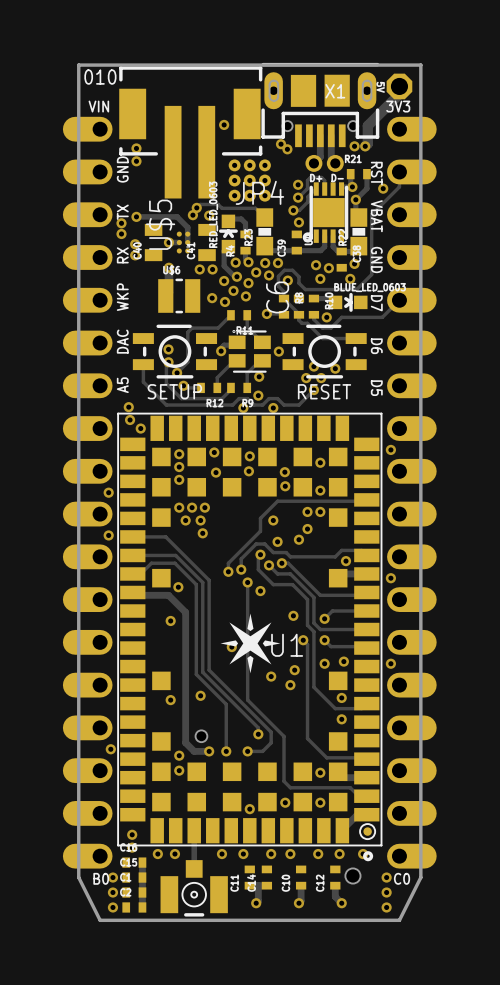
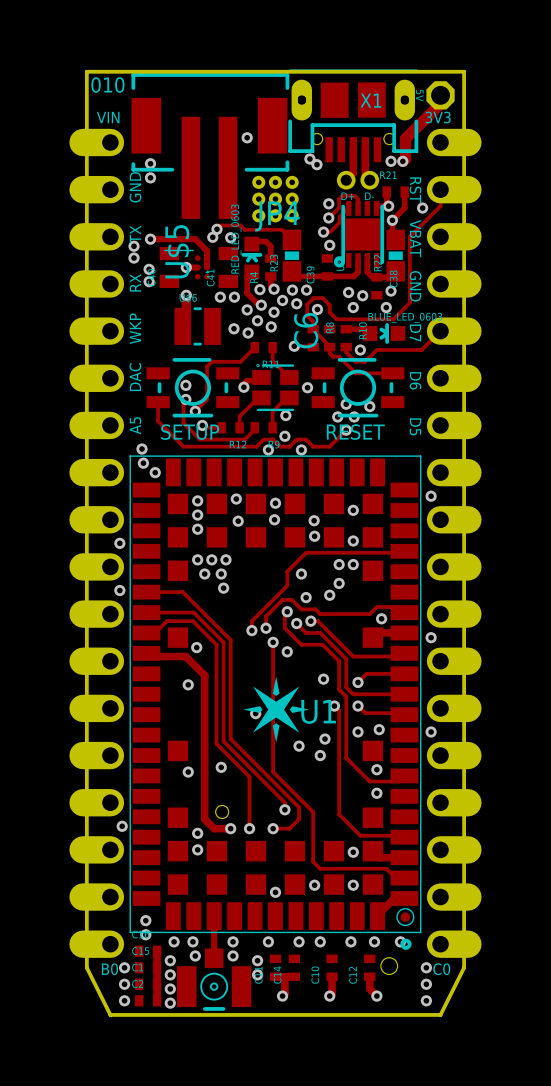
via: none -> (233, 941)
via: (222, 854) -> none
via: none -> (195, 955)
via: none -> (233, 955)
via: none -> (170, 960)
via: none -> (257, 960)
via: none -> (170, 974)
via: none -> (257, 974)
via: none -> (170, 989)
via: none -> (170, 1003)

